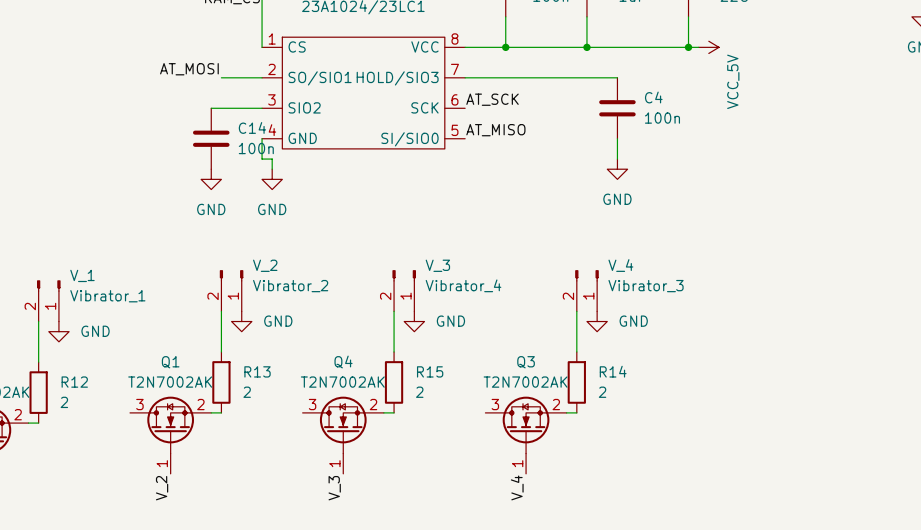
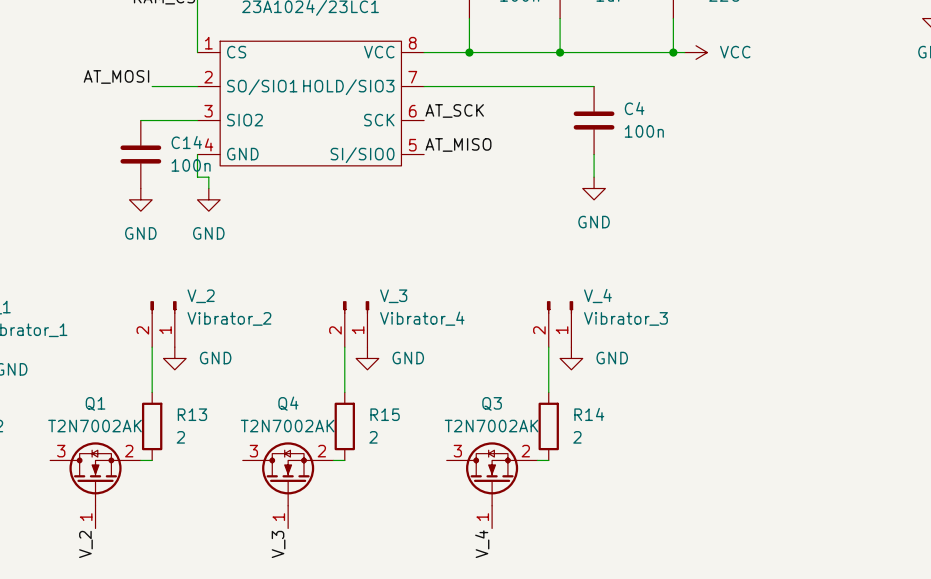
power symbol: VCC_5V (708, 47) -> VCC (696, 52)

